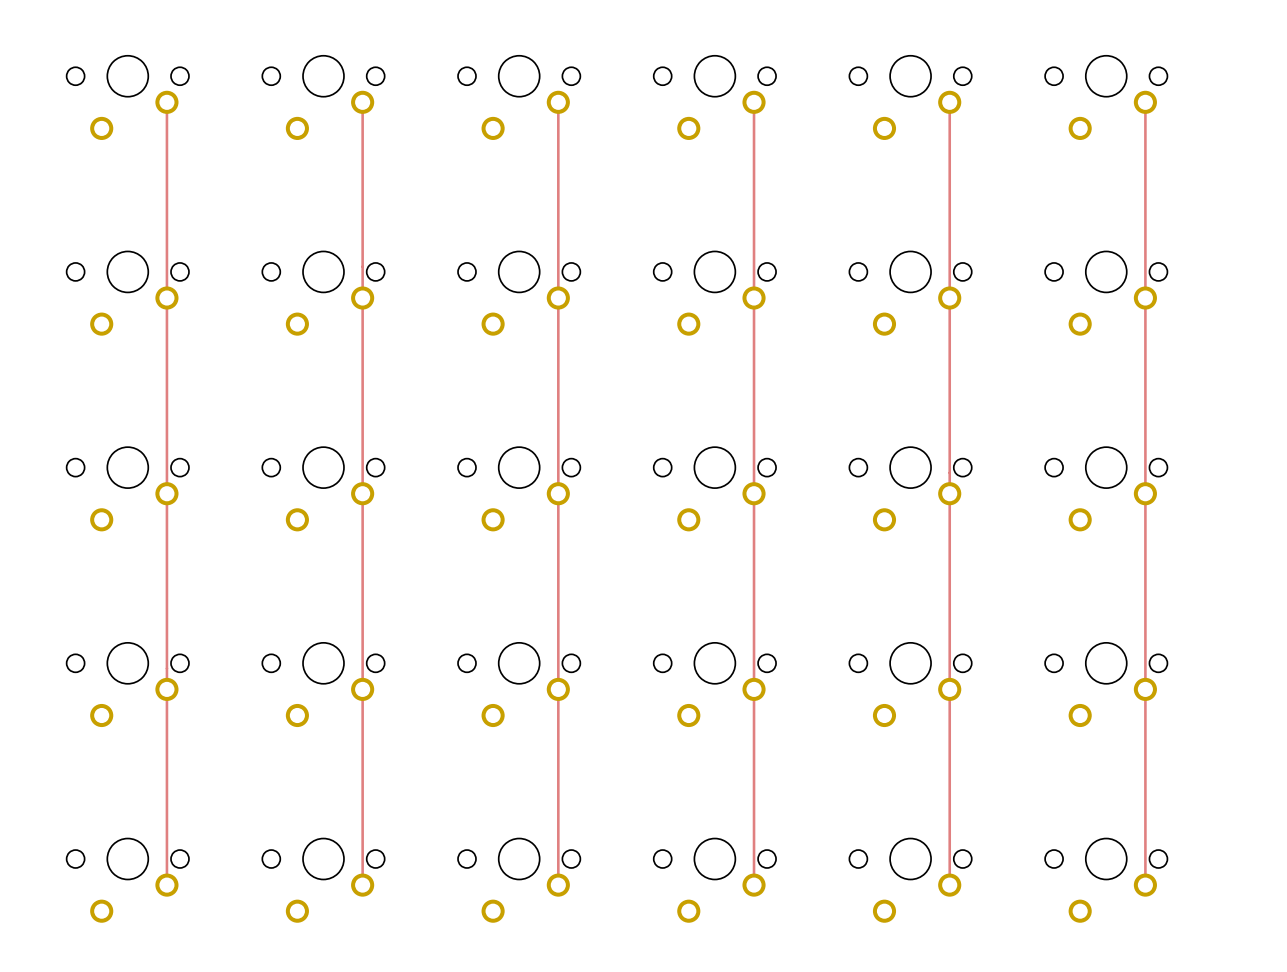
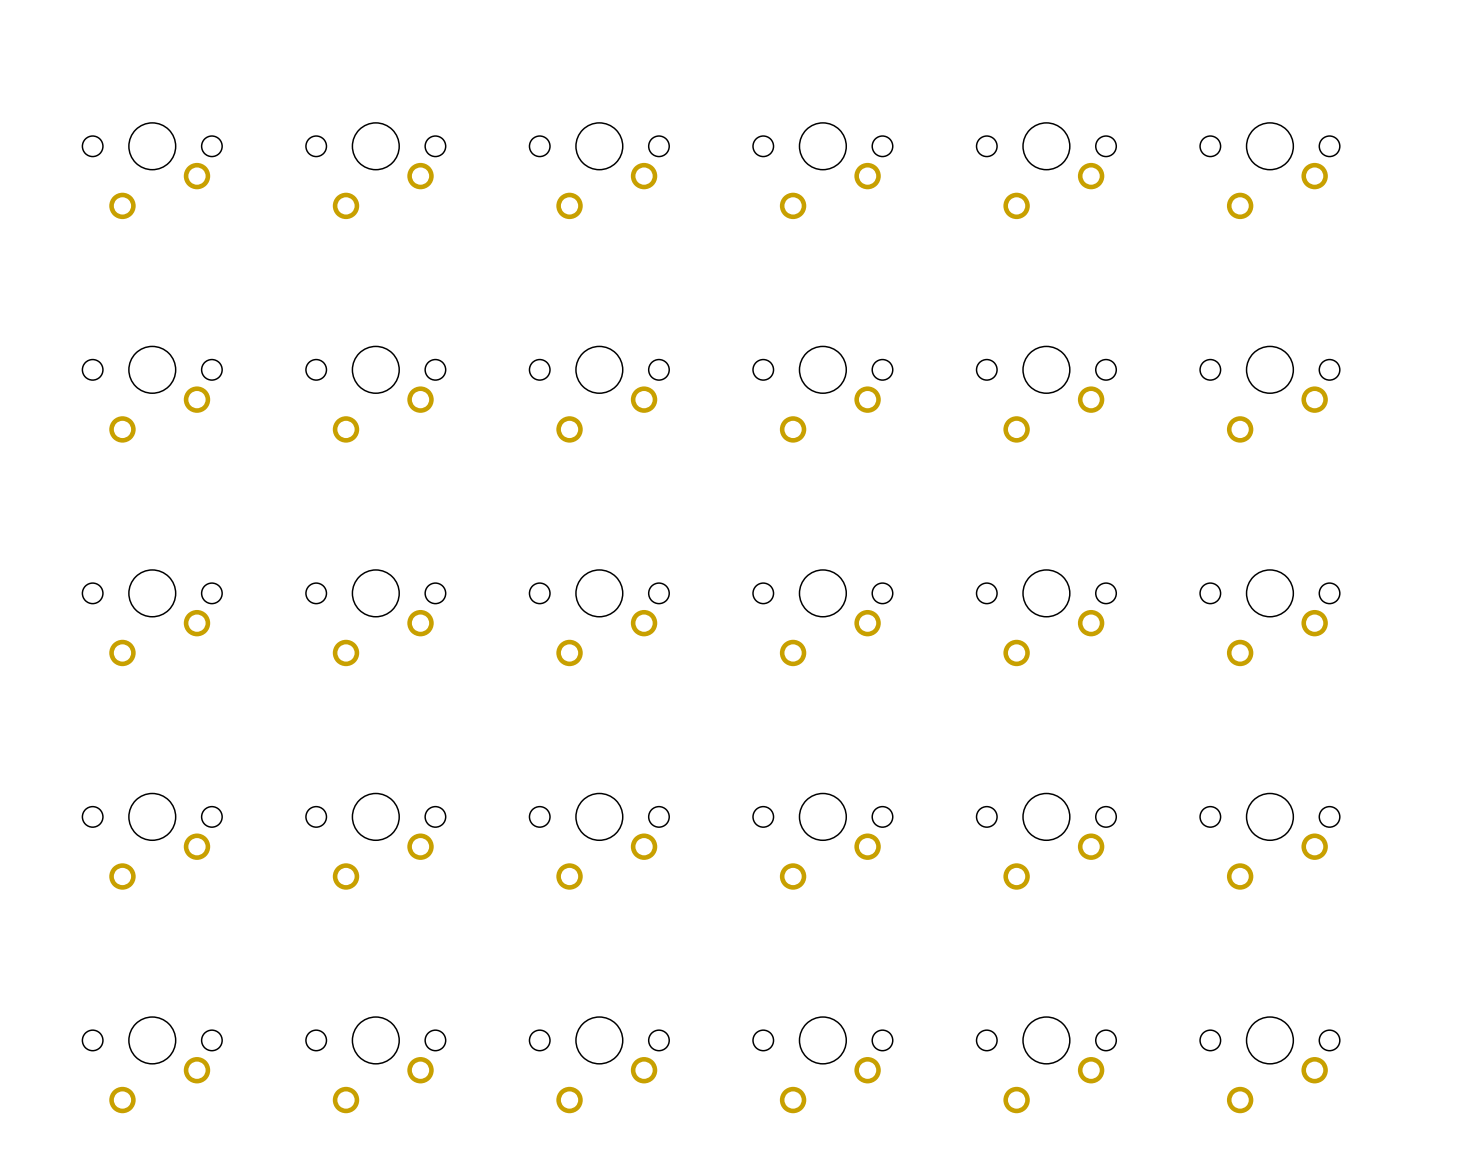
track: (166, 102) (166, 885) -> none
track: (362, 102) (362, 885) -> none
track: (558, 102) (558, 885) -> none
track: (754, 102) (754, 885) -> none
track: (949, 102) (949, 885) -> none
track: (1145, 102) (1145, 885) -> none

